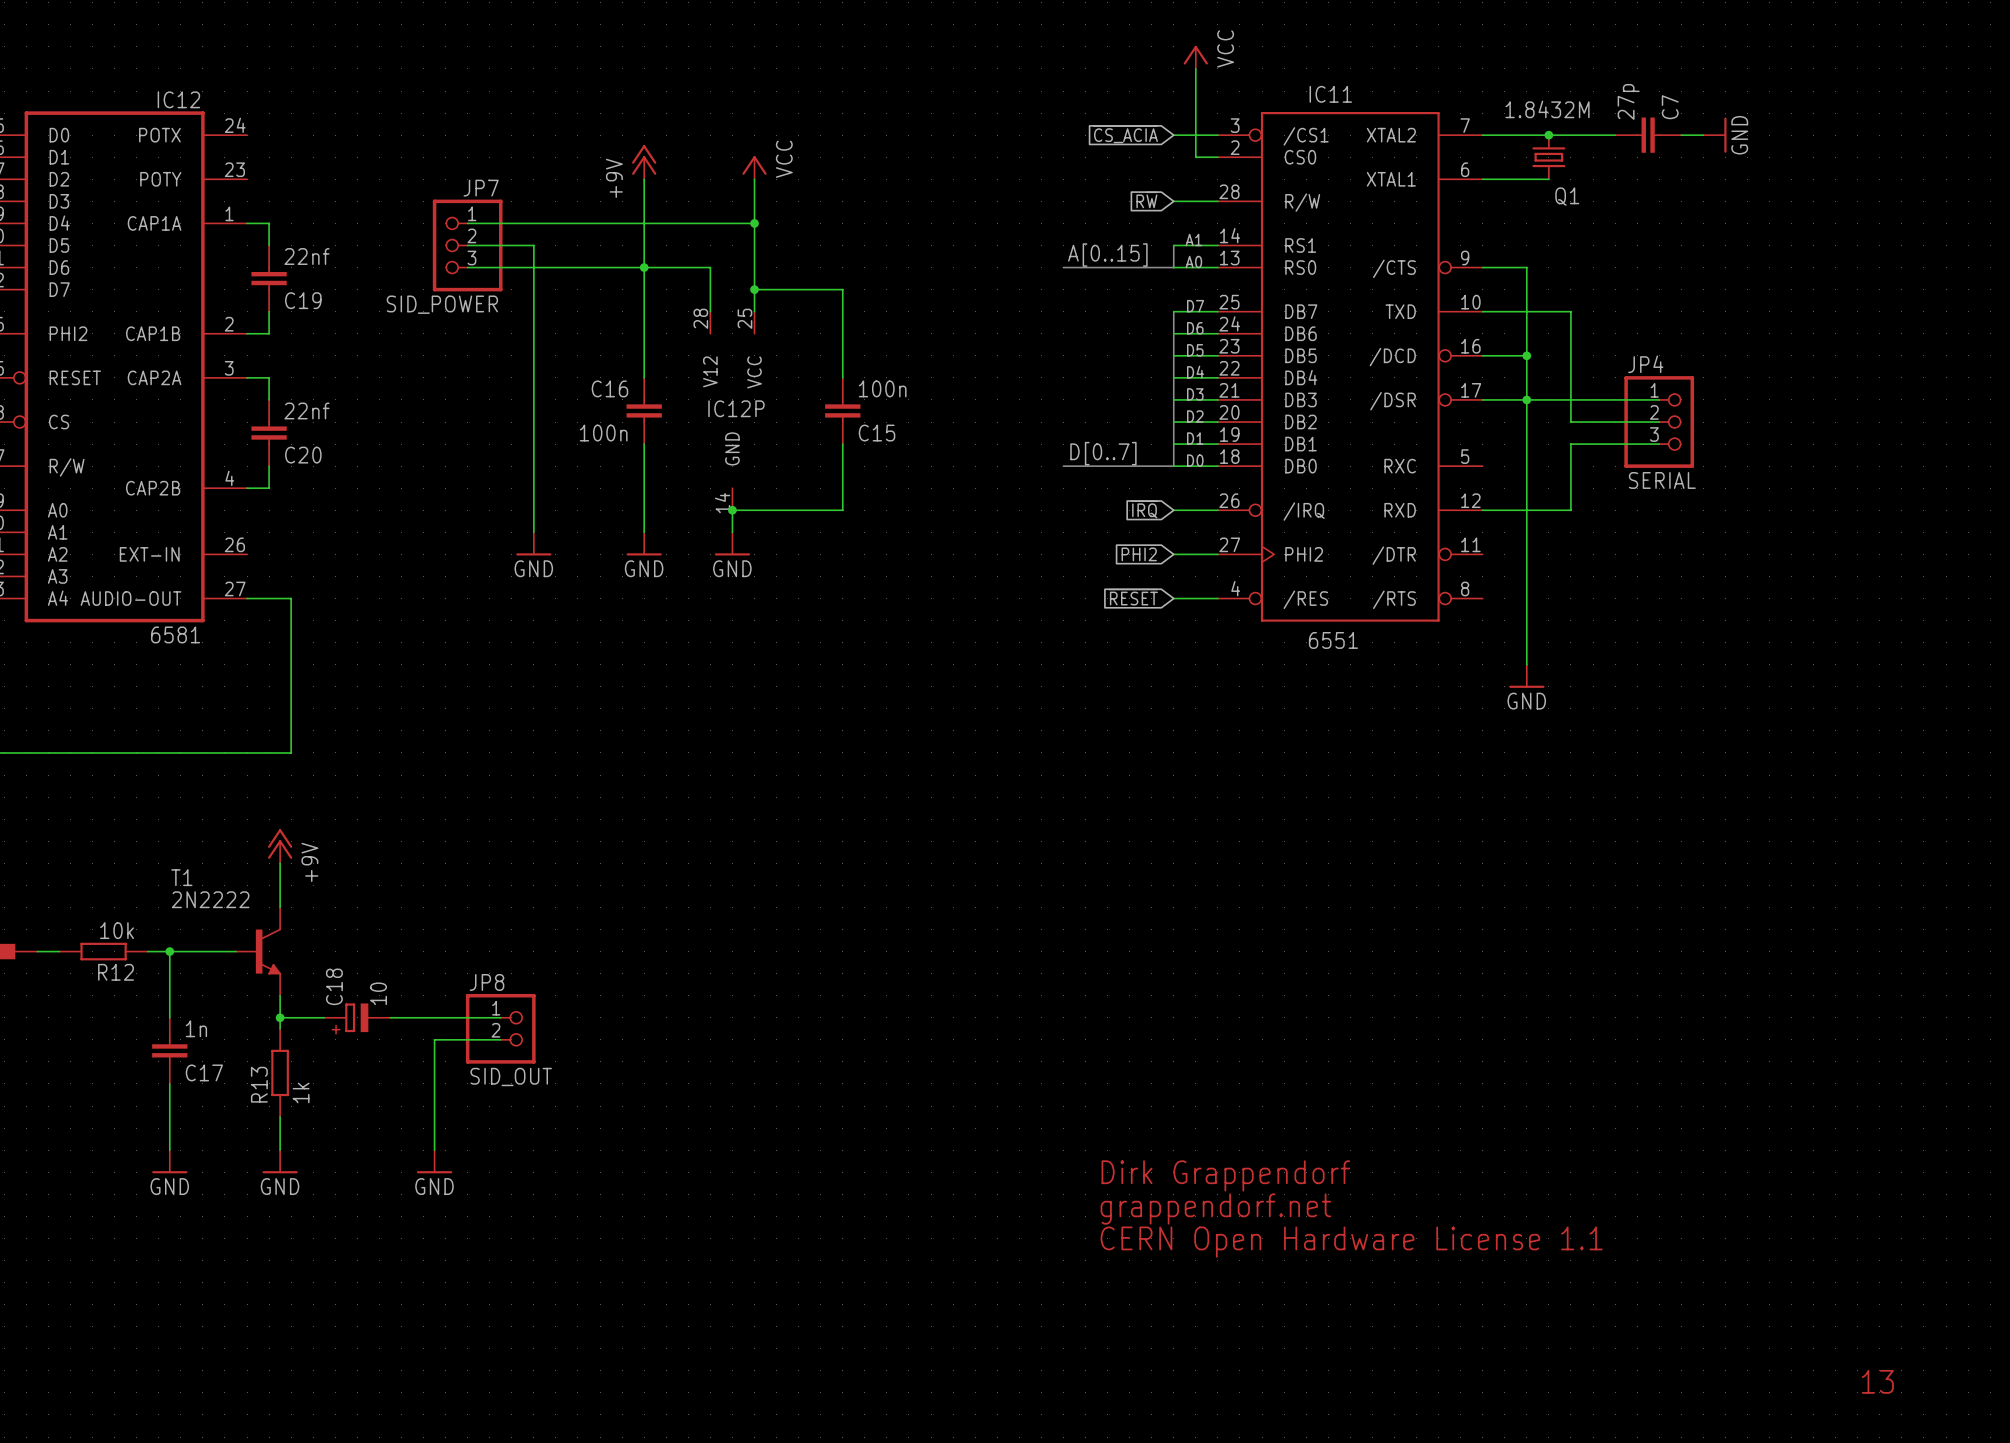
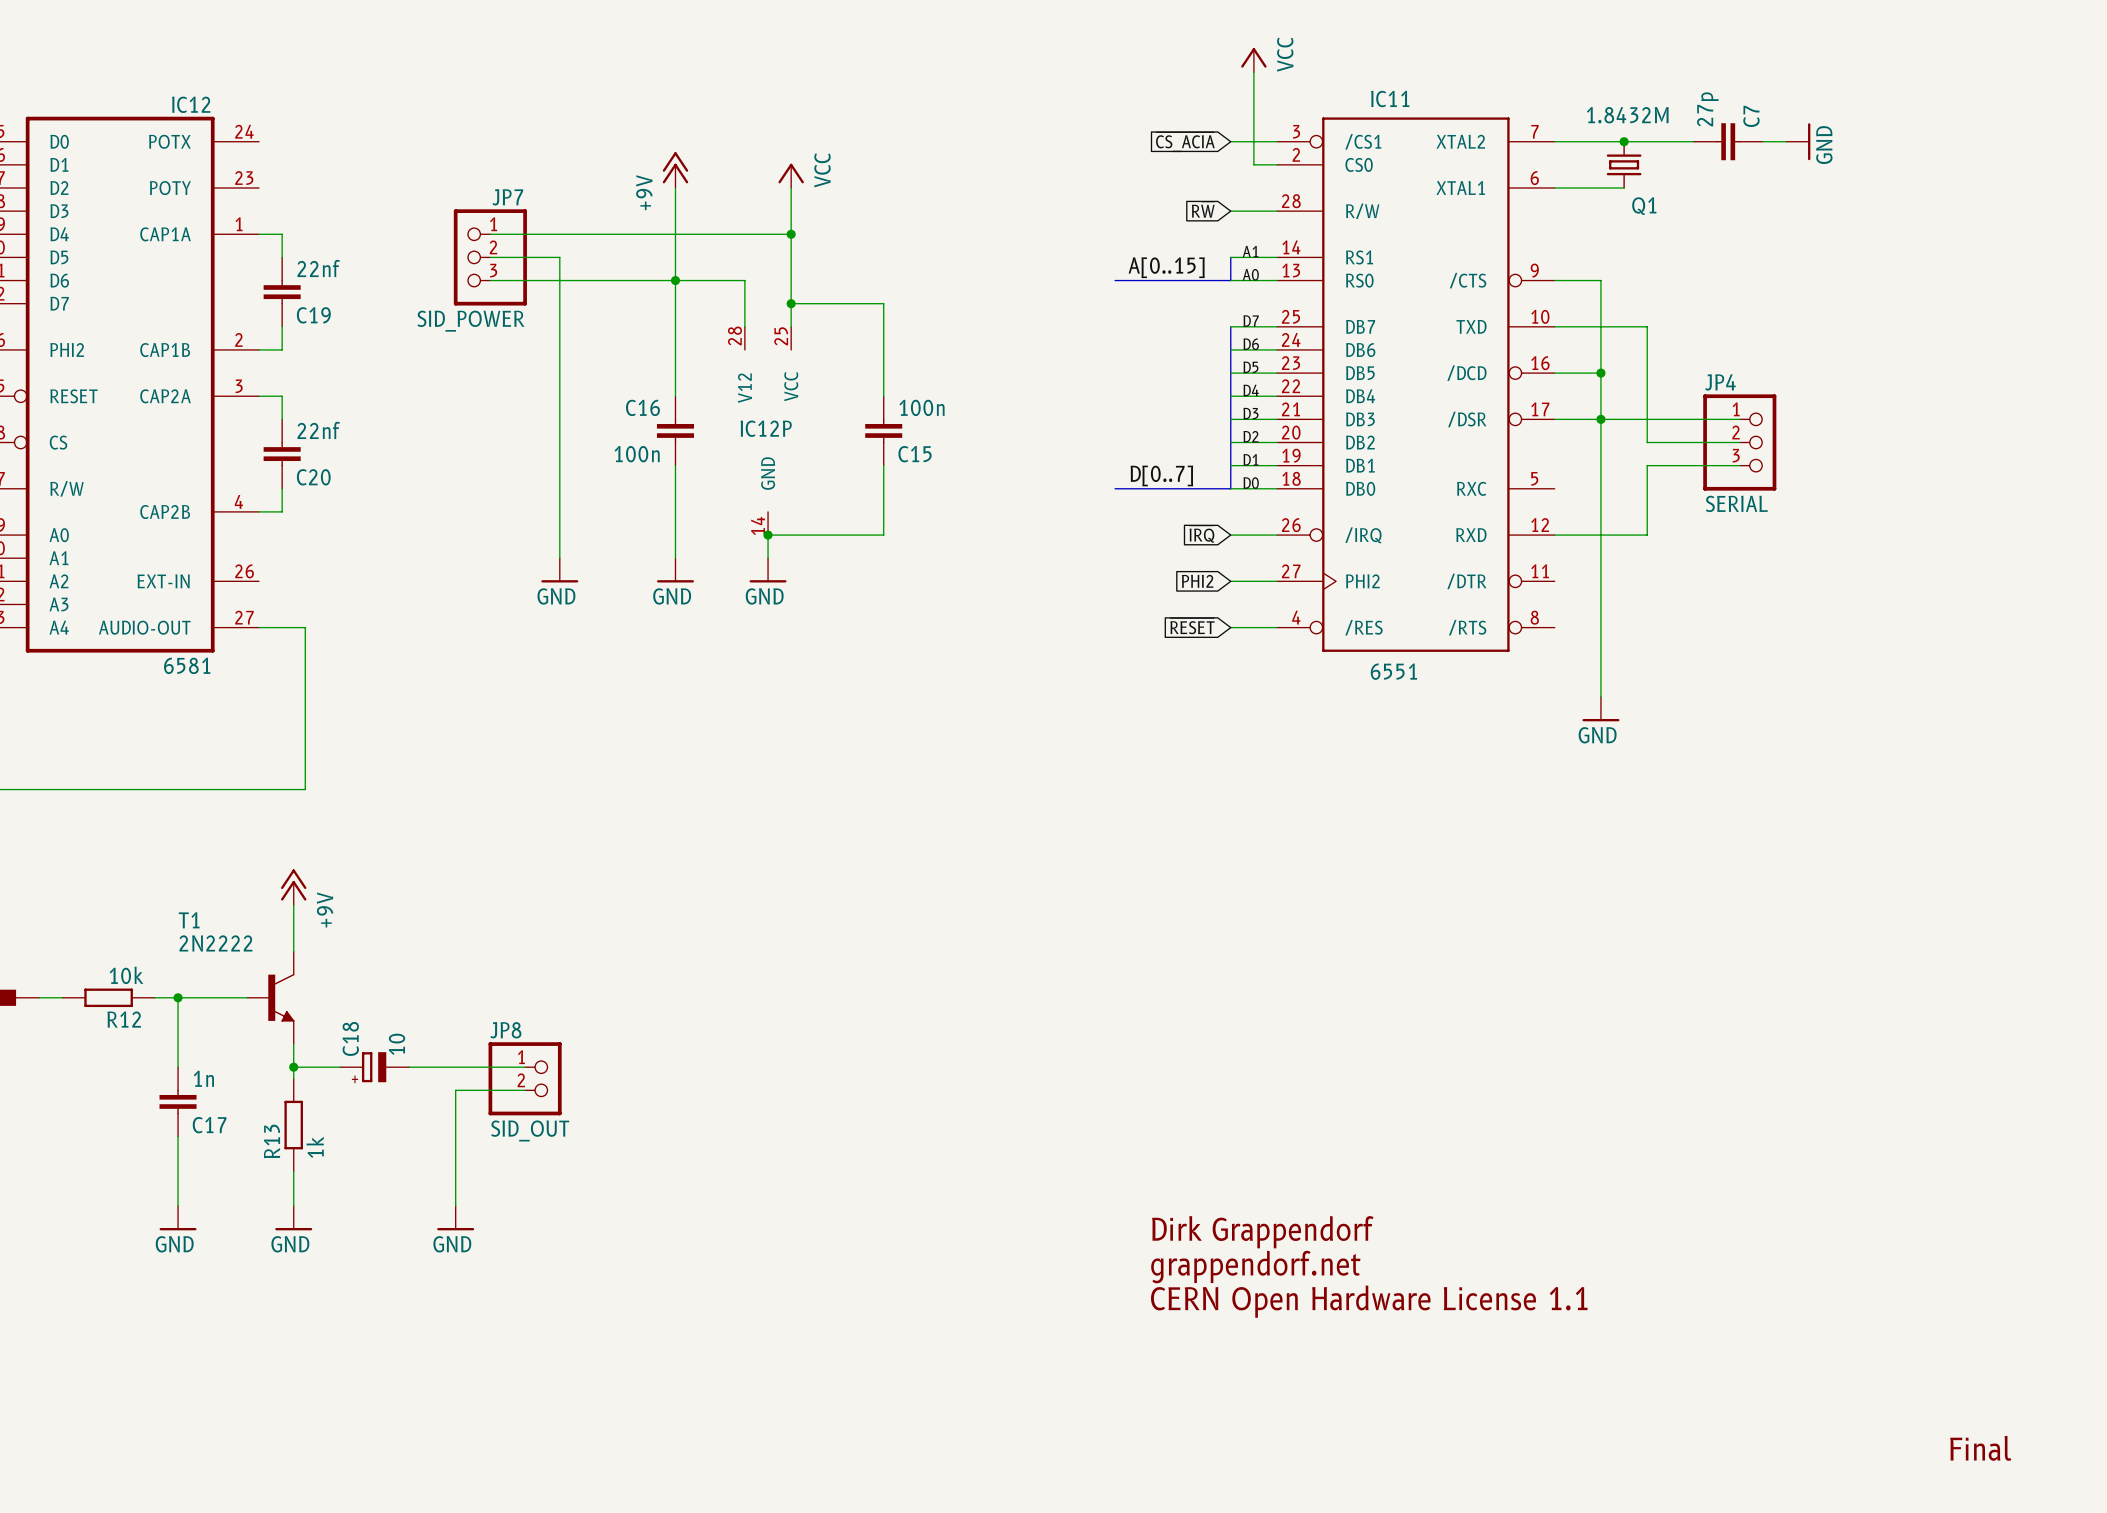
text: 13 (1877, 1381) -> Final (1980, 1448)

